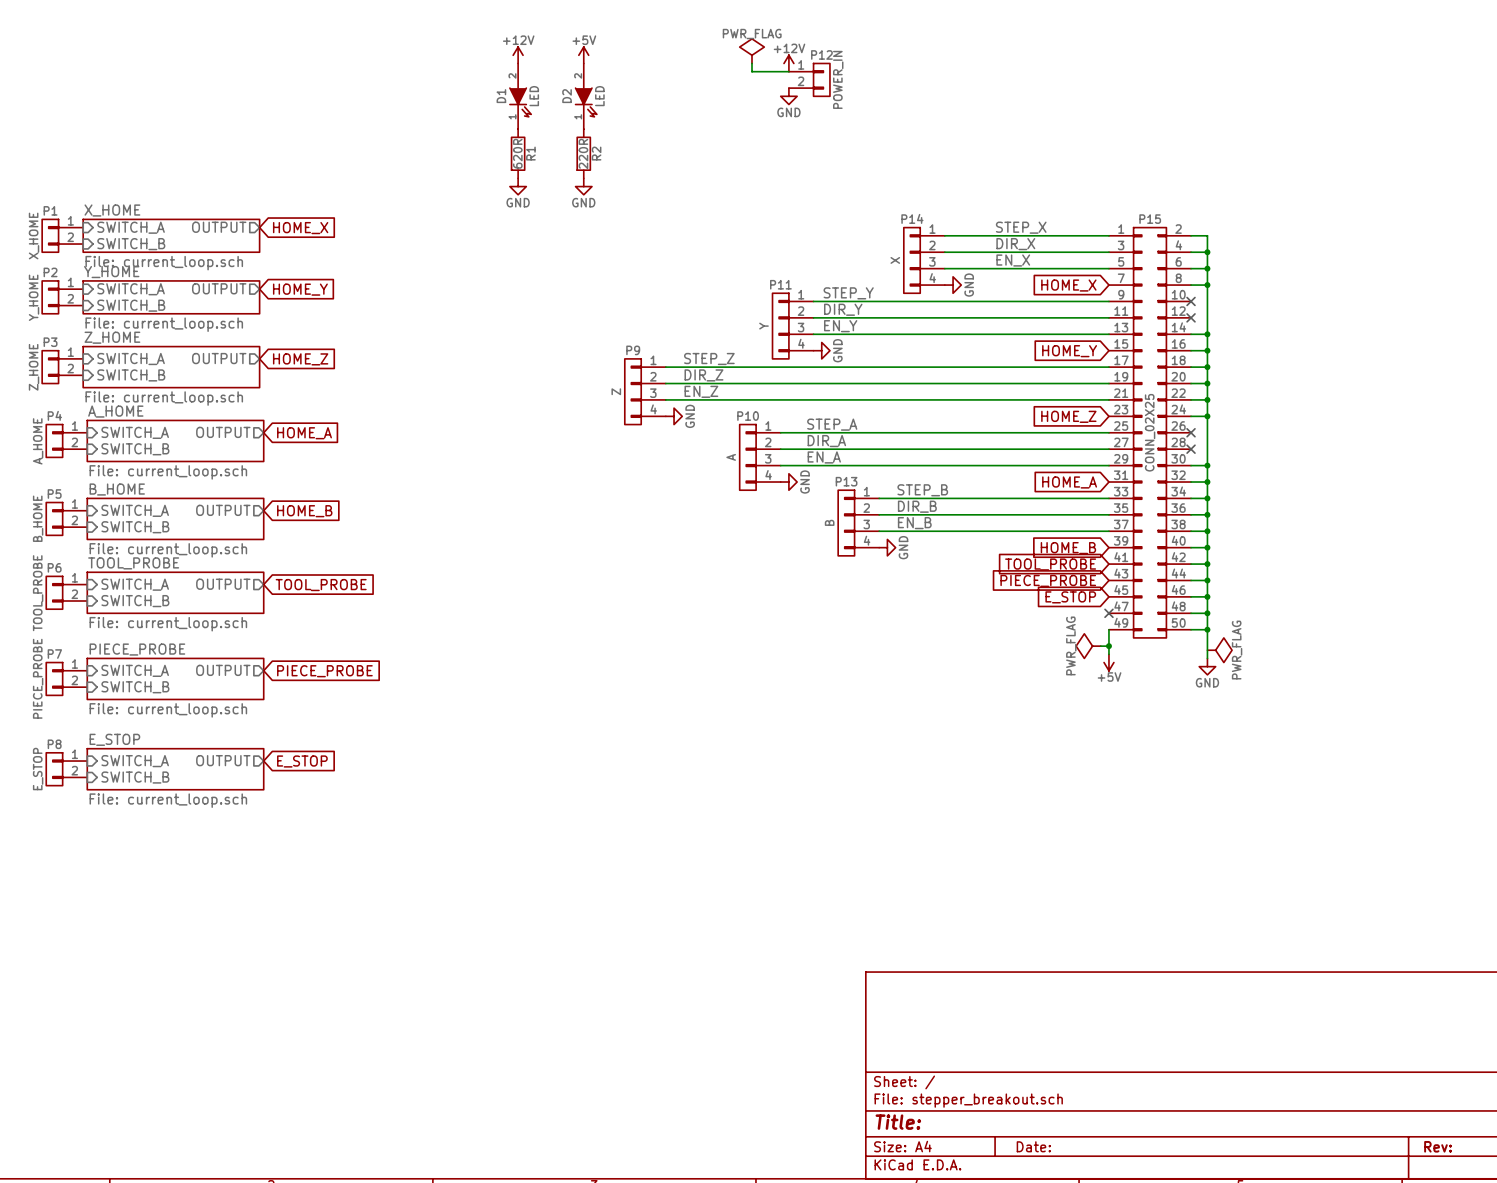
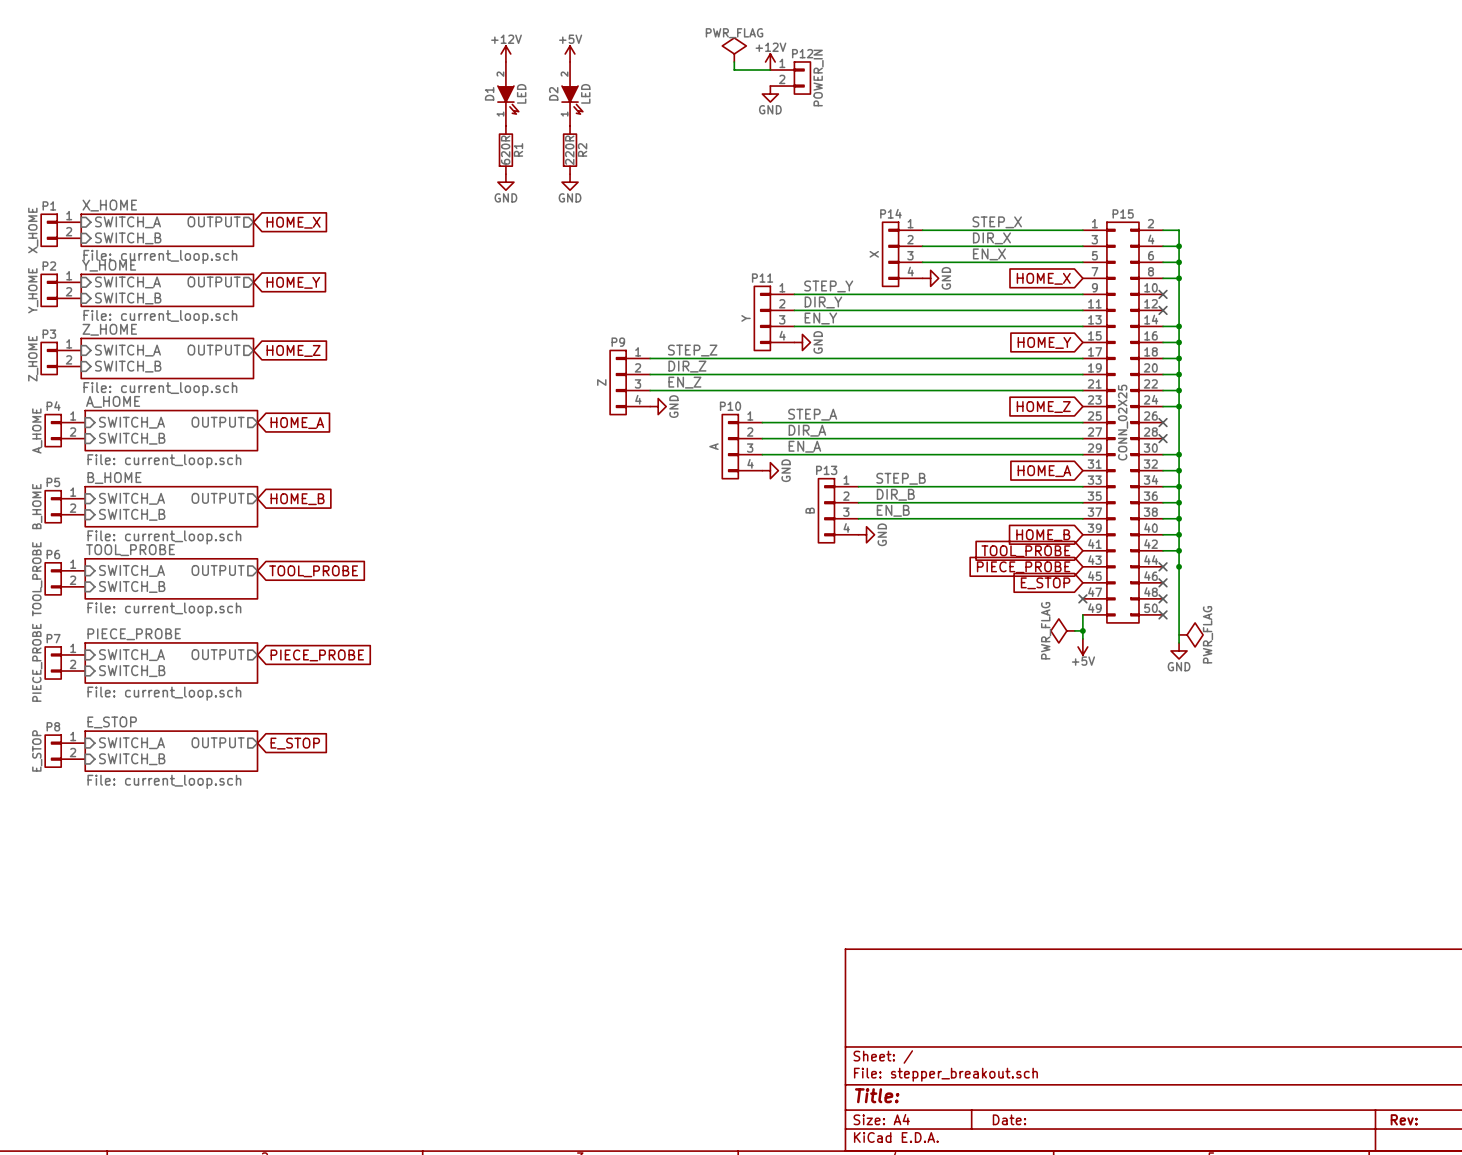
wire: (1191, 580) (1207, 580) -> none
no-connect mark: none -> (1163, 566)
wire: (1191, 596) (1207, 596) -> none
no-connect mark: none -> (1163, 582)
junction: (1207, 596) -> none
wire: (1191, 613) (1207, 613) -> none
no-connect mark: none -> (1163, 598)
junction: (1207, 613) -> none
wire: (1191, 629) (1207, 629) -> none
no-connect mark: none -> (1163, 614)
junction: (1207, 629) -> none

